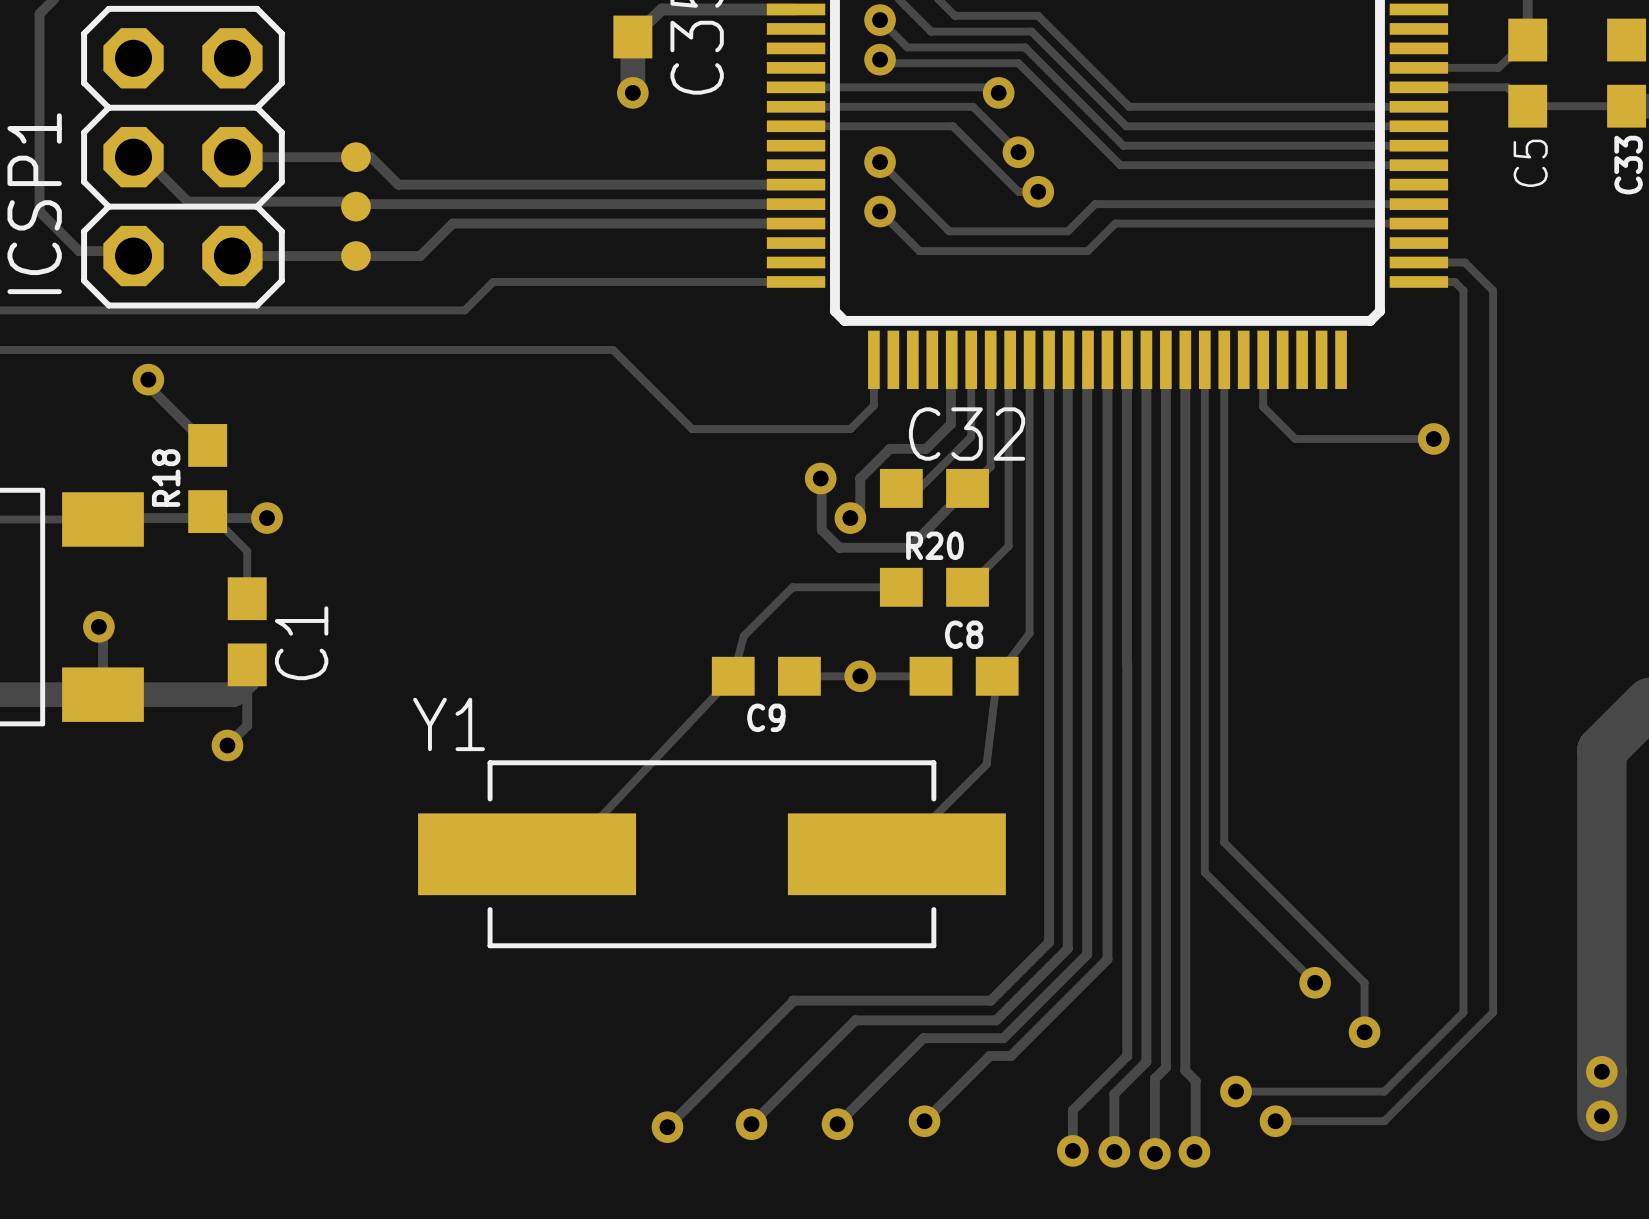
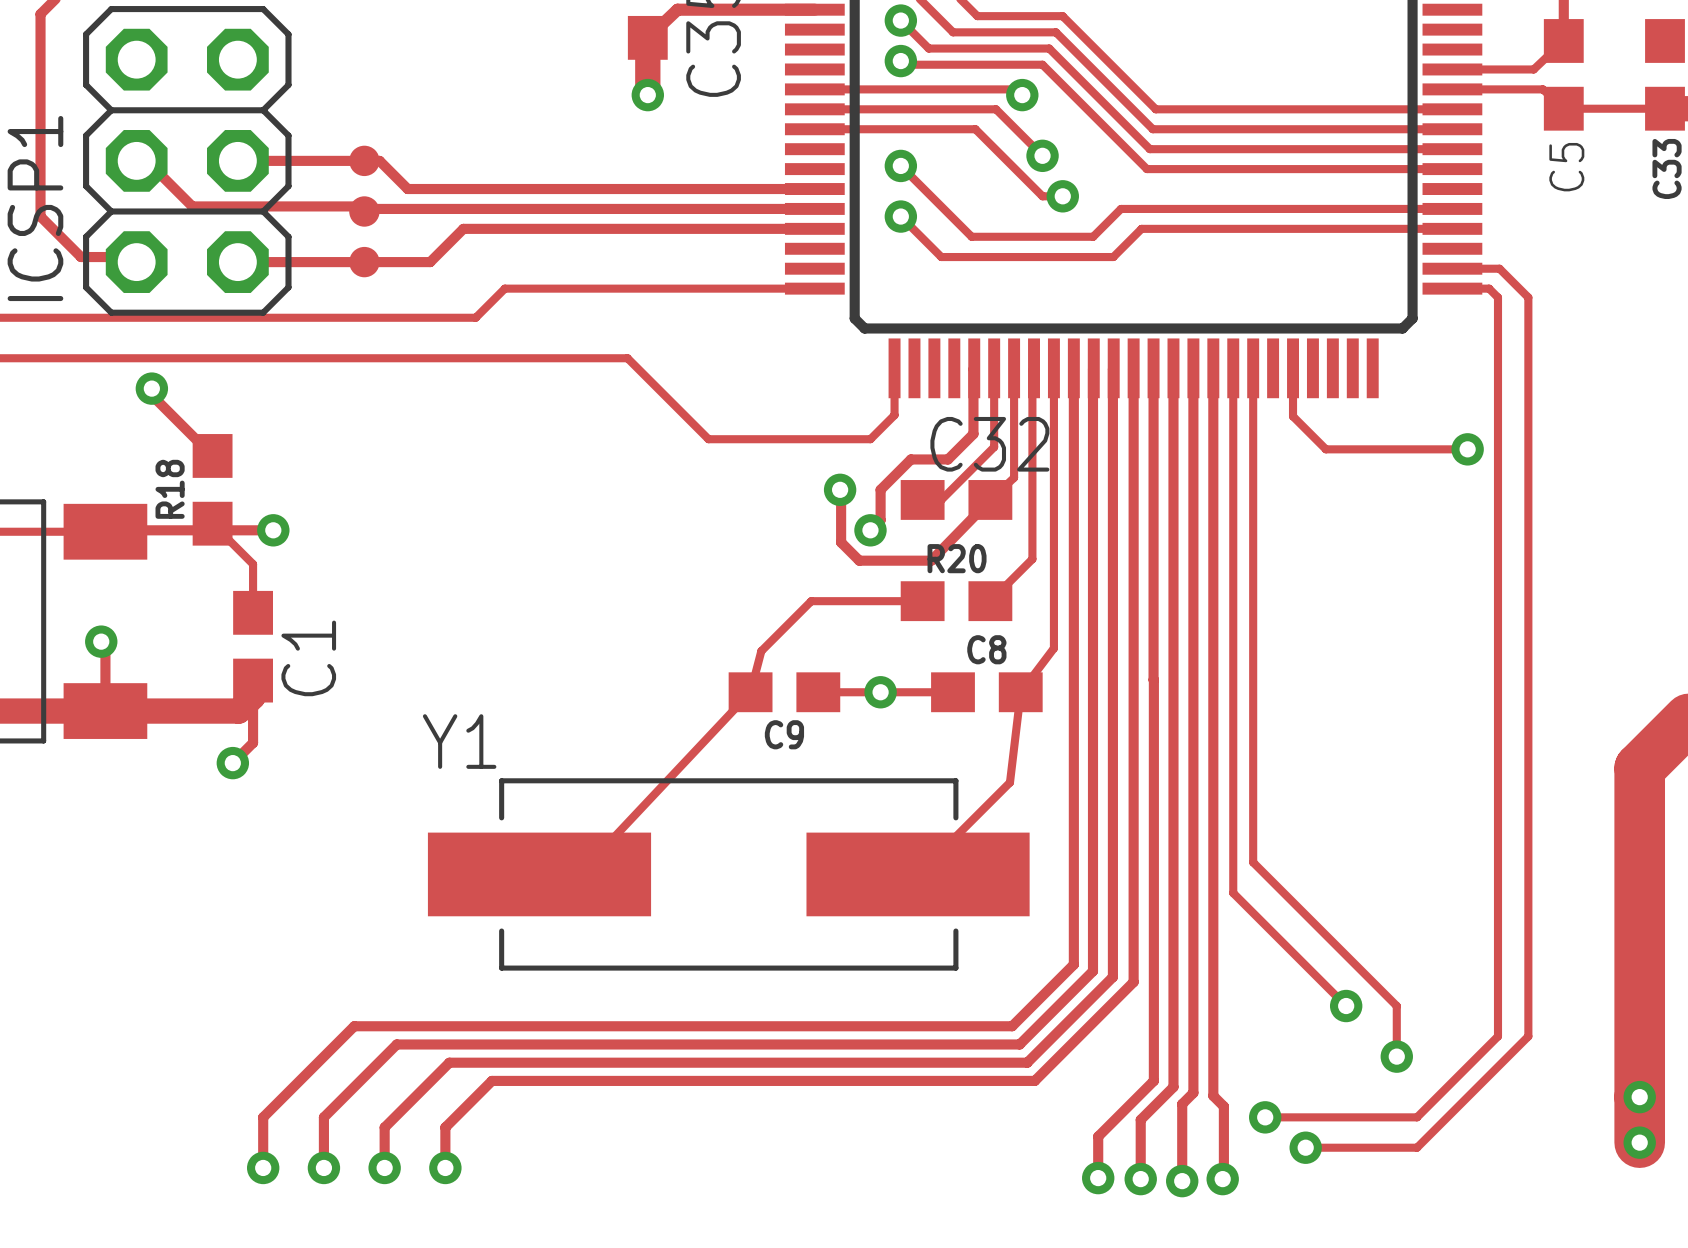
track: (990, 1000) (793, 1000) (667, 1127) -> (1014, 1024) (1012, 1026) (354, 1026) (263, 1117) (263, 1167)
track: (855, 1020) (751, 1124) -> (875, 1044) (396, 1044) (323, 1117) (323, 1167)
track: (923, 1038) (837, 1124) -> (945, 1062) (449, 1062) (384, 1127) (384, 1167)
track: (989, 1055) (924, 1121) -> (1013, 1080) (491, 1080) (445, 1127) (445, 1167)
via: (924, 1121) -> none
via: (751, 1124) -> none
via: (837, 1124) -> none
via: (667, 1127) -> none
via: none -> (263, 1167)
via: none -> (323, 1167)
via: none -> (384, 1167)
via: none -> (445, 1167)

